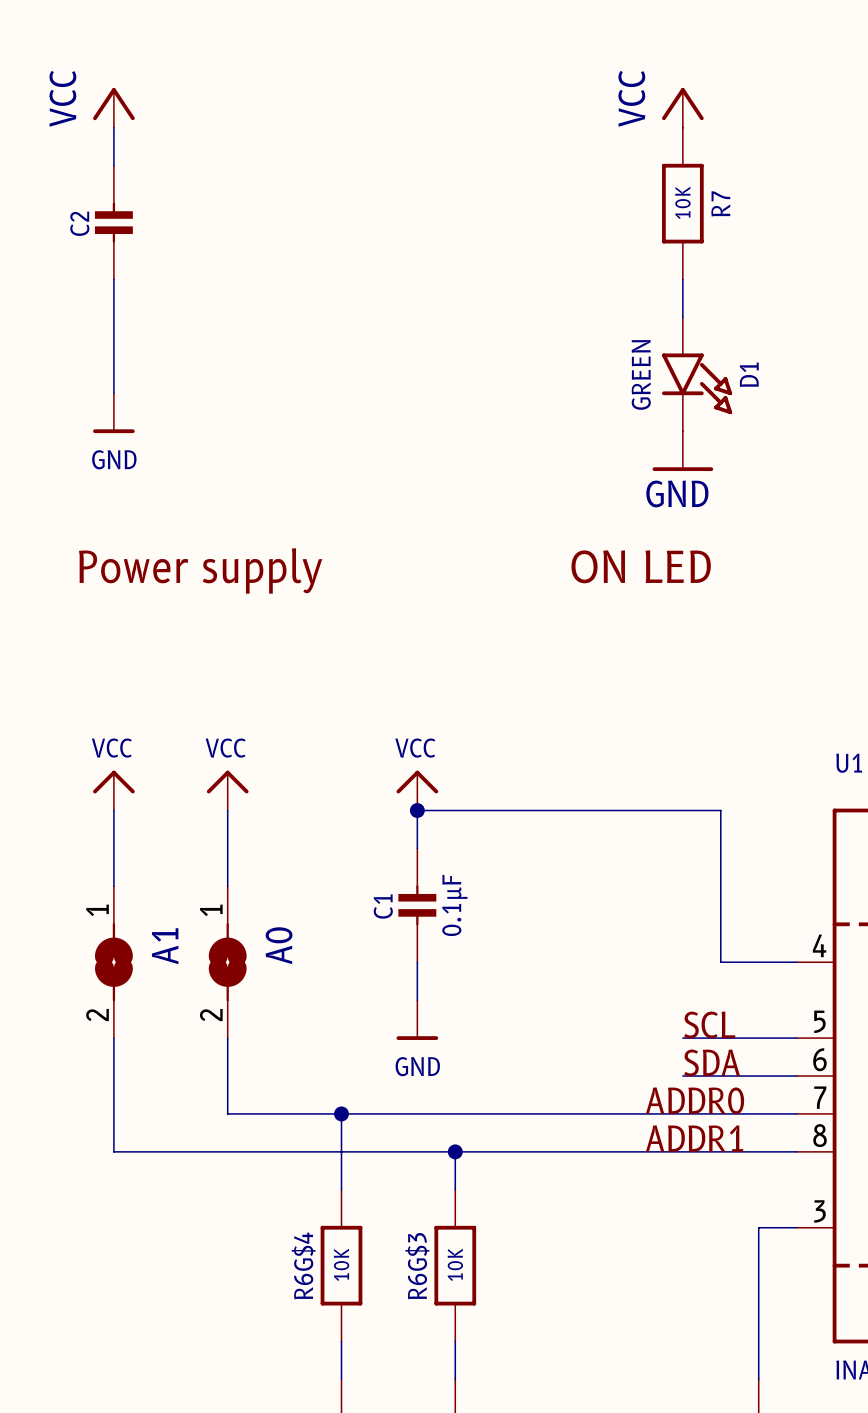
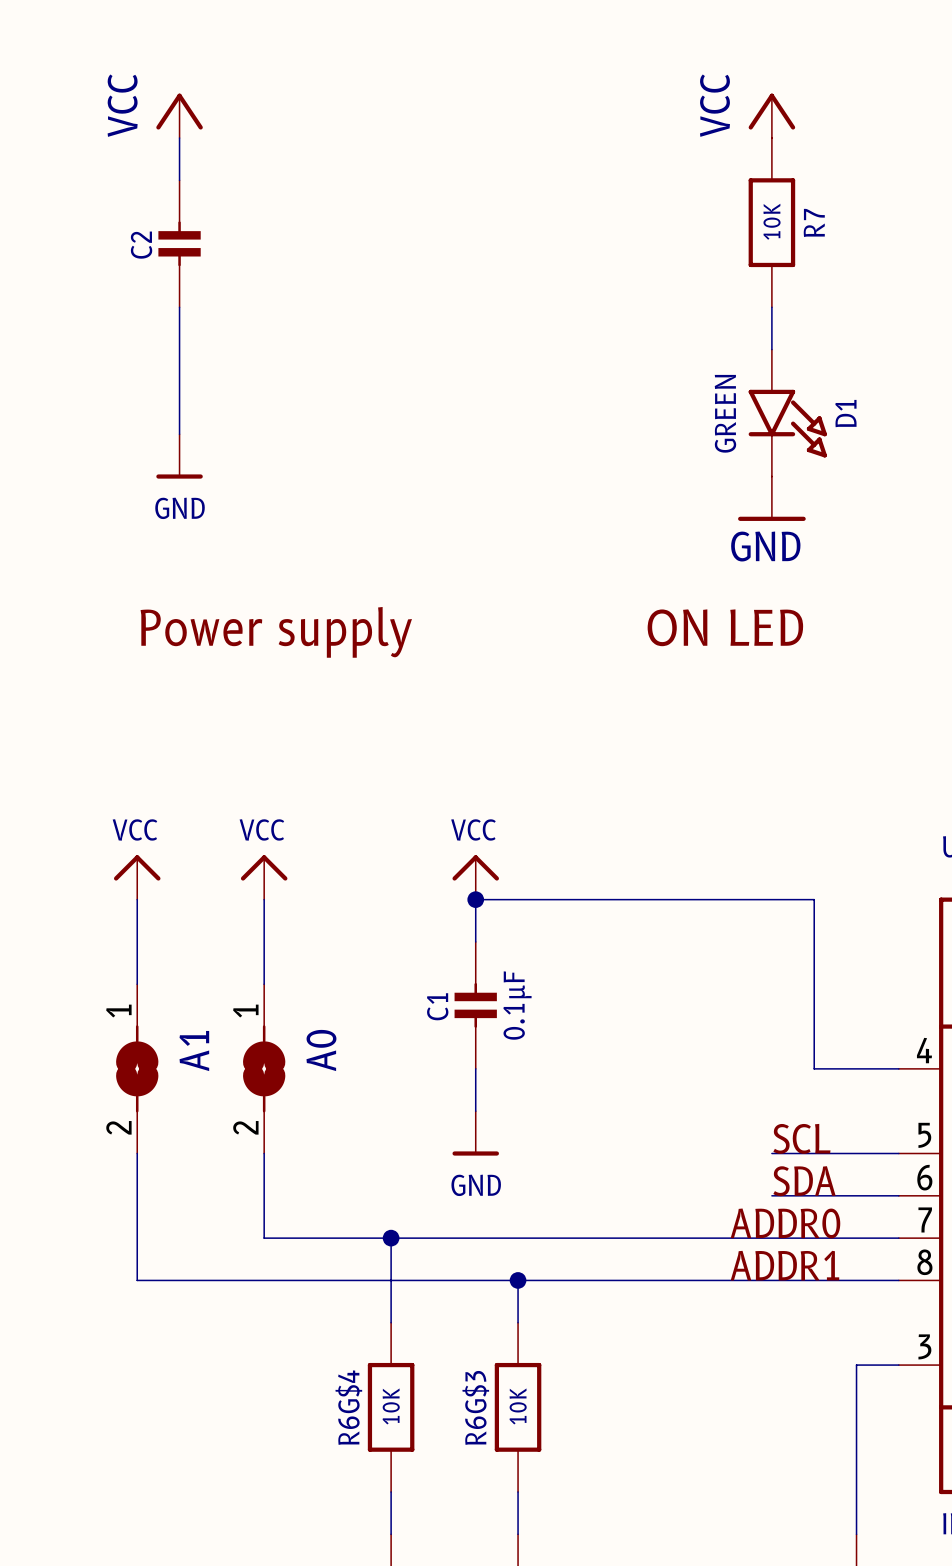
power symbol position: VCC (113, 107) -> VCC (179, 115)
wire: (113, 127) (113, 165) -> (179, 138) (179, 180)
C2 position: (113, 222) -> (179, 243)
wire: (113, 279) (113, 393) -> (179, 307) (179, 434)
power symbol position: GND (113, 413) -> GND (179, 456)
text position: Power supply (200, 570) -> Power supply (276, 632)

